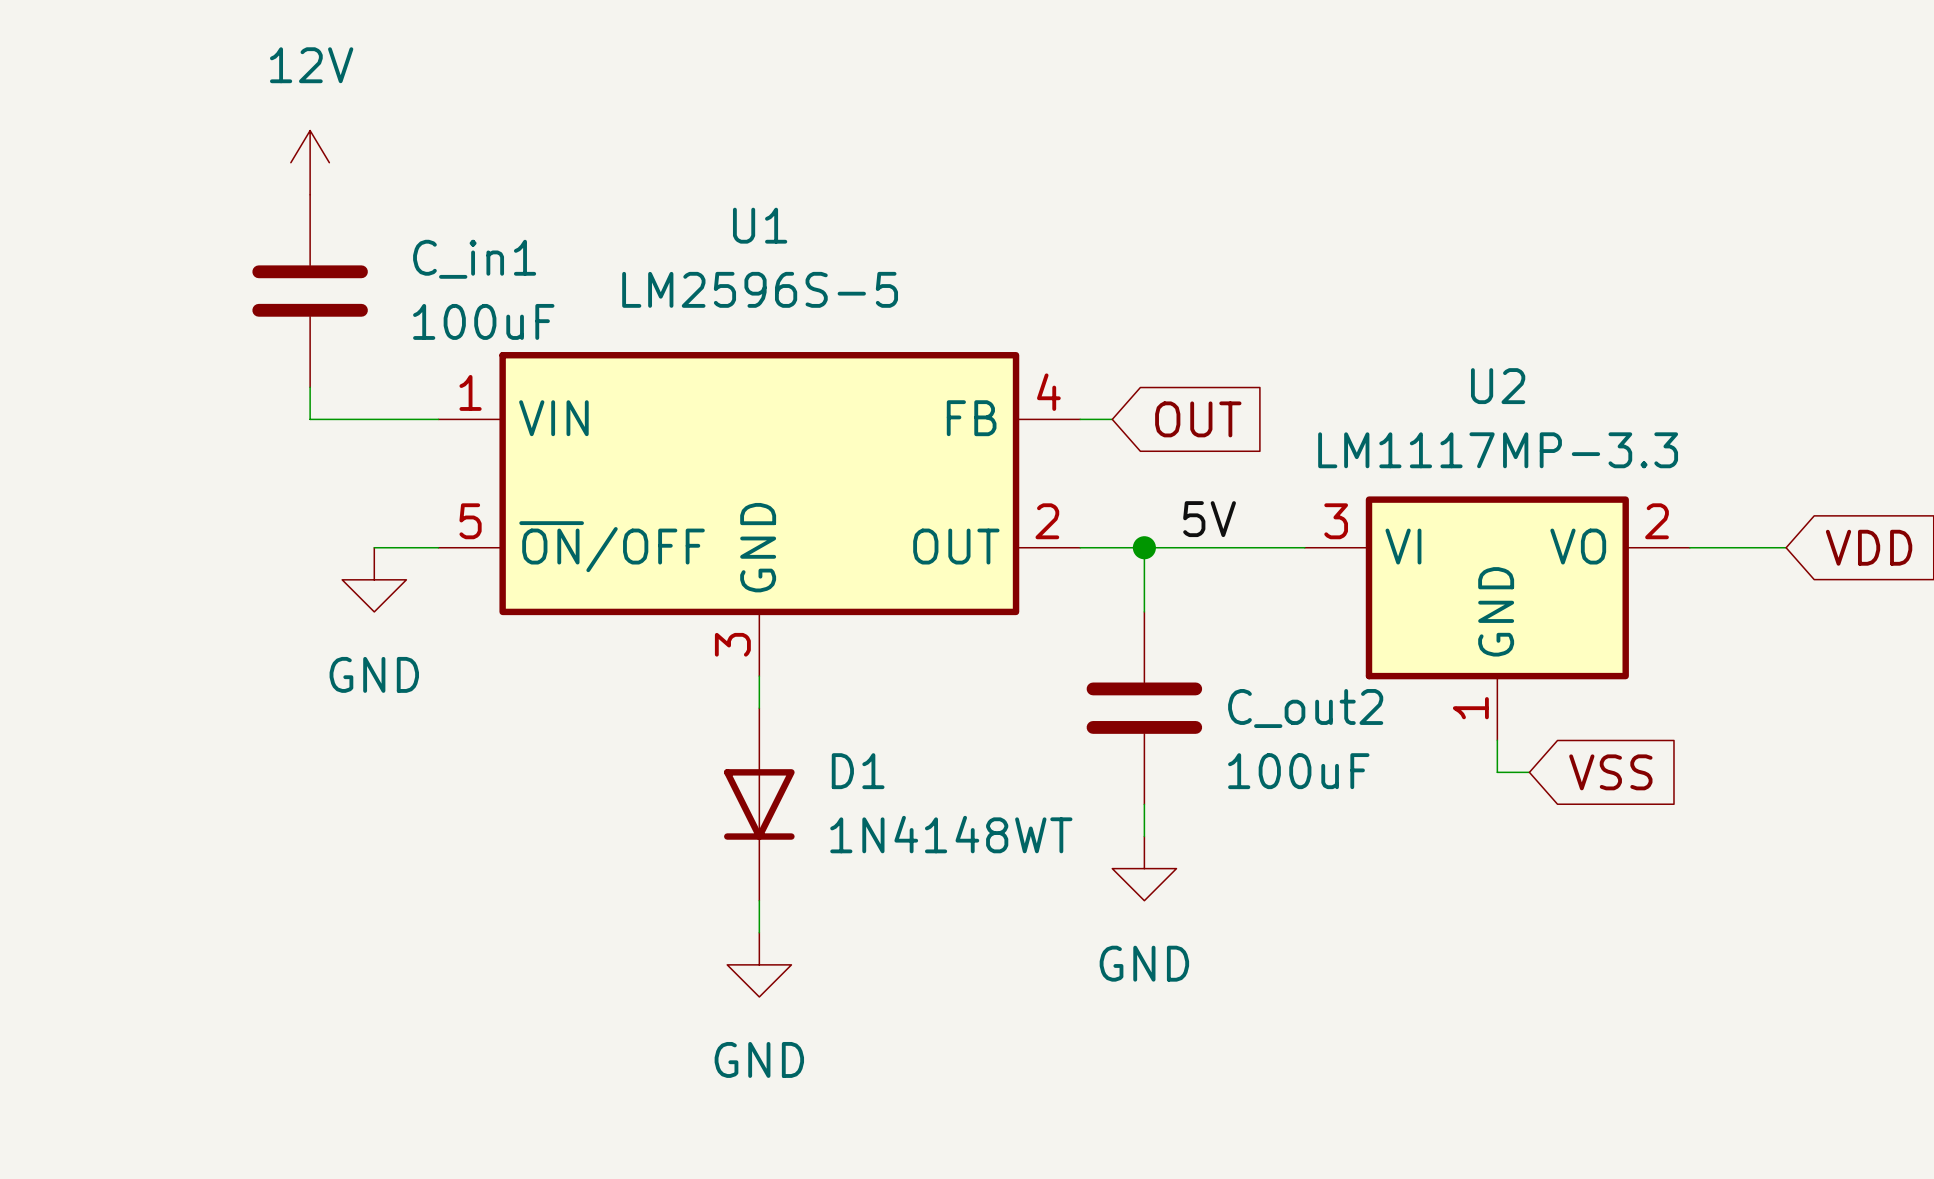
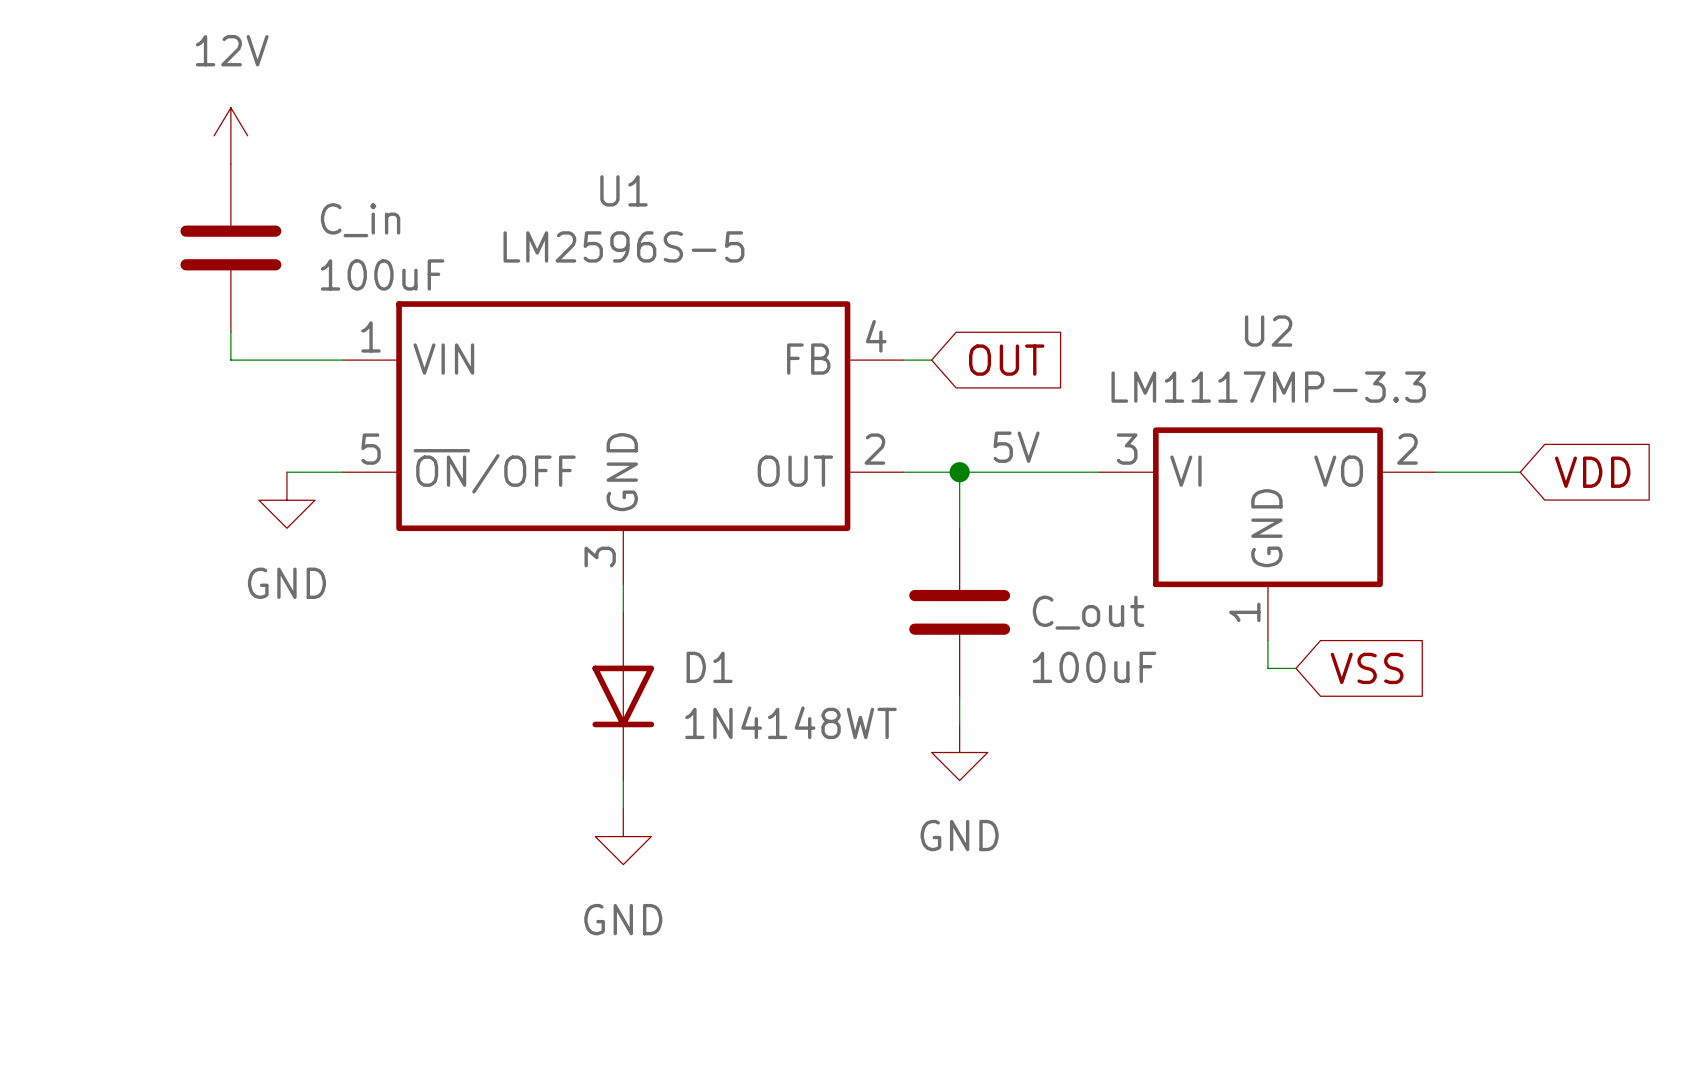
C_in1 name: C_in1 (474, 259) -> C_in (360, 220)
C_out2 name: C_out2 (1305, 708) -> C_out (1088, 612)

